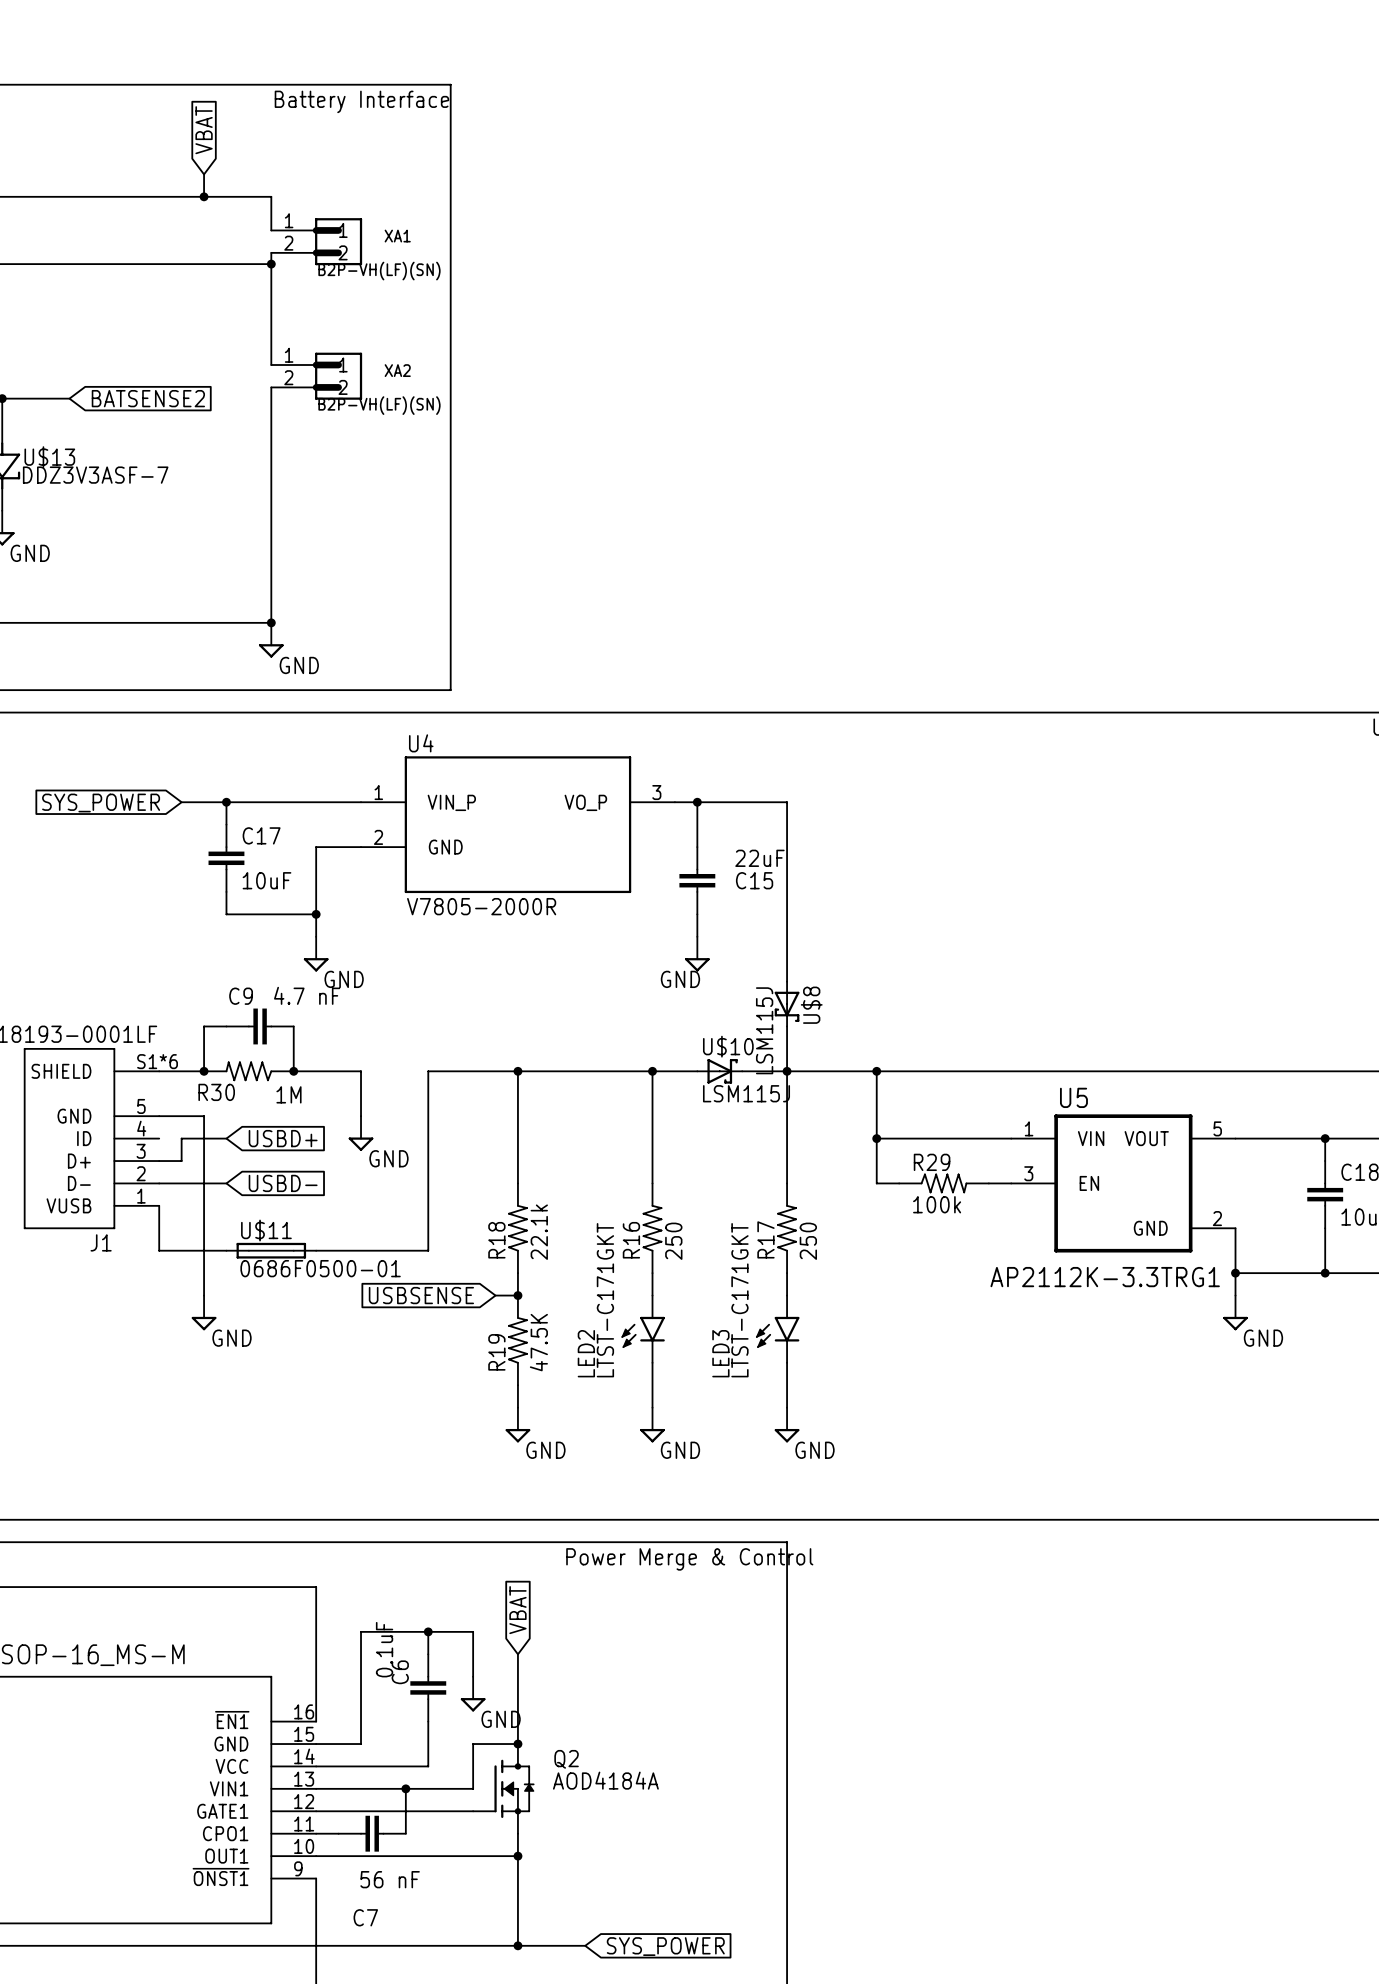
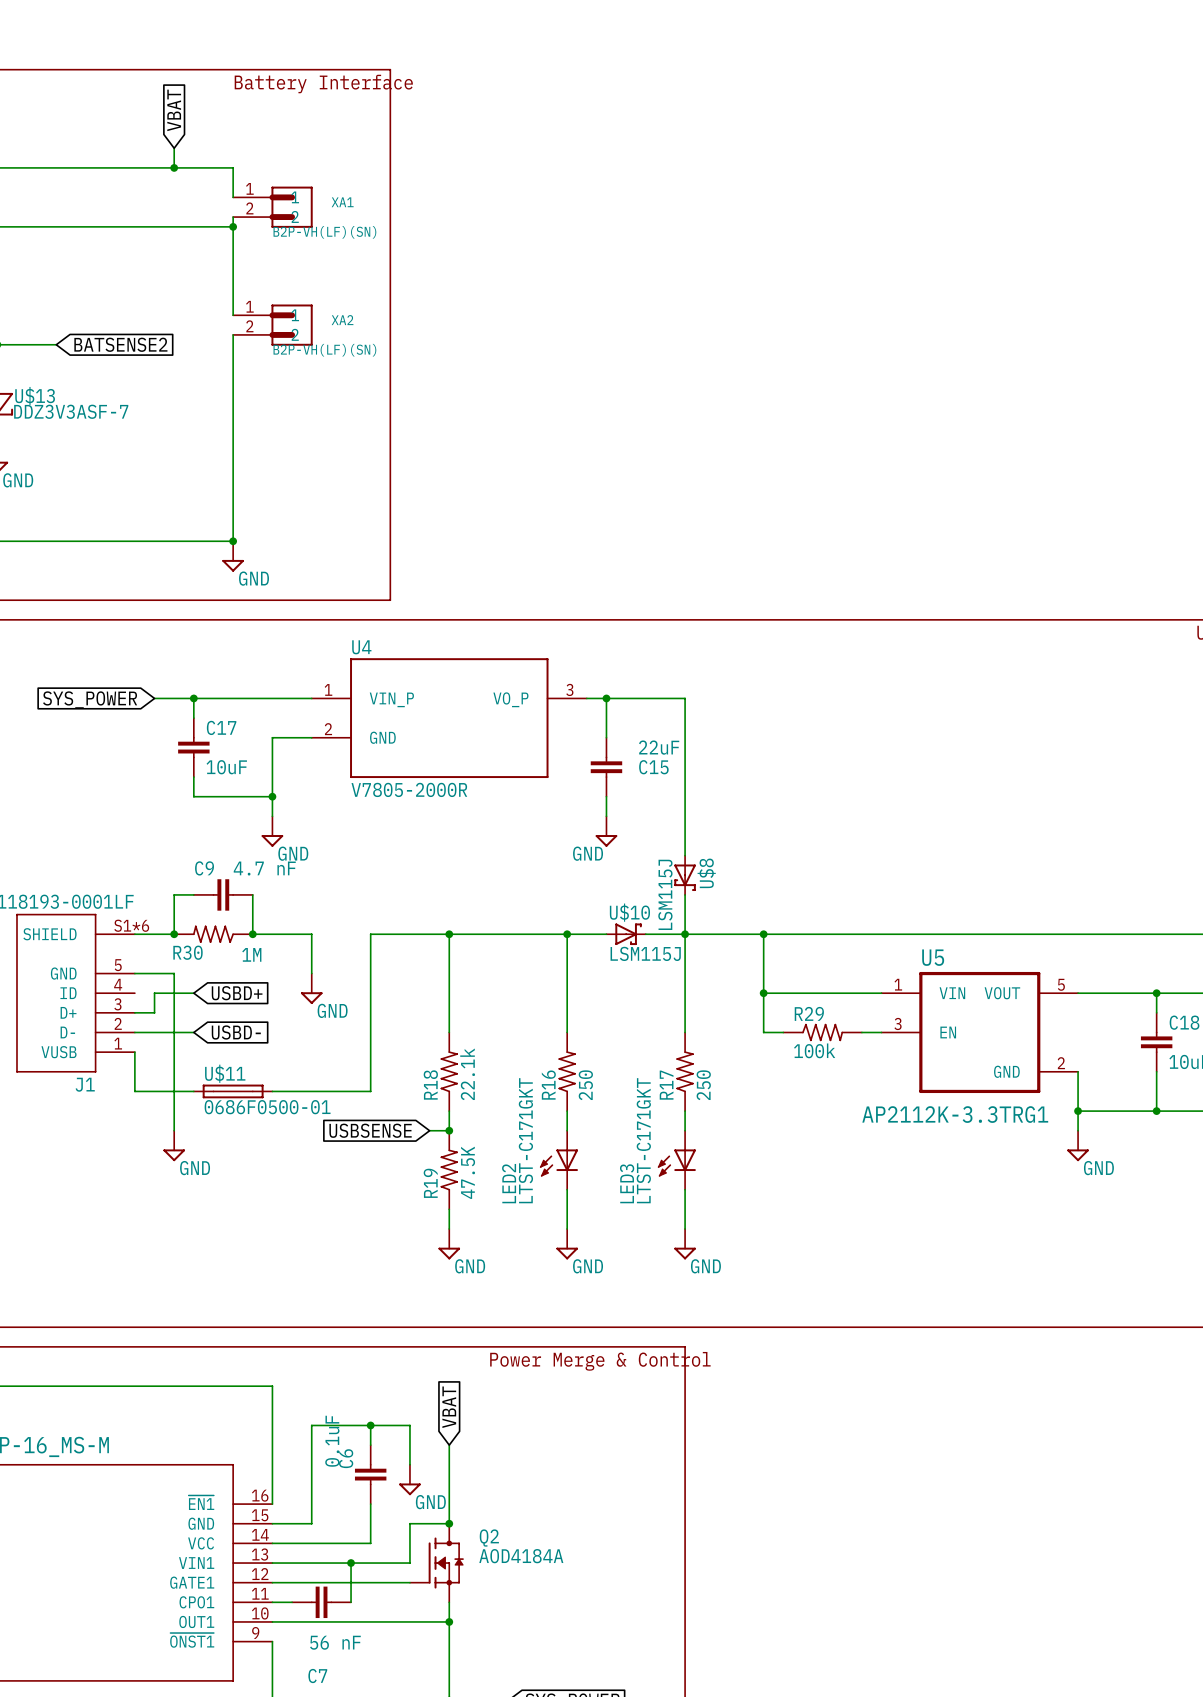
LED2 symbol: [621, 1295, 665, 1363] -> [540, 1130, 578, 1190]
LED3 symbol: [756, 1295, 800, 1363] -> [657, 1130, 696, 1190]

